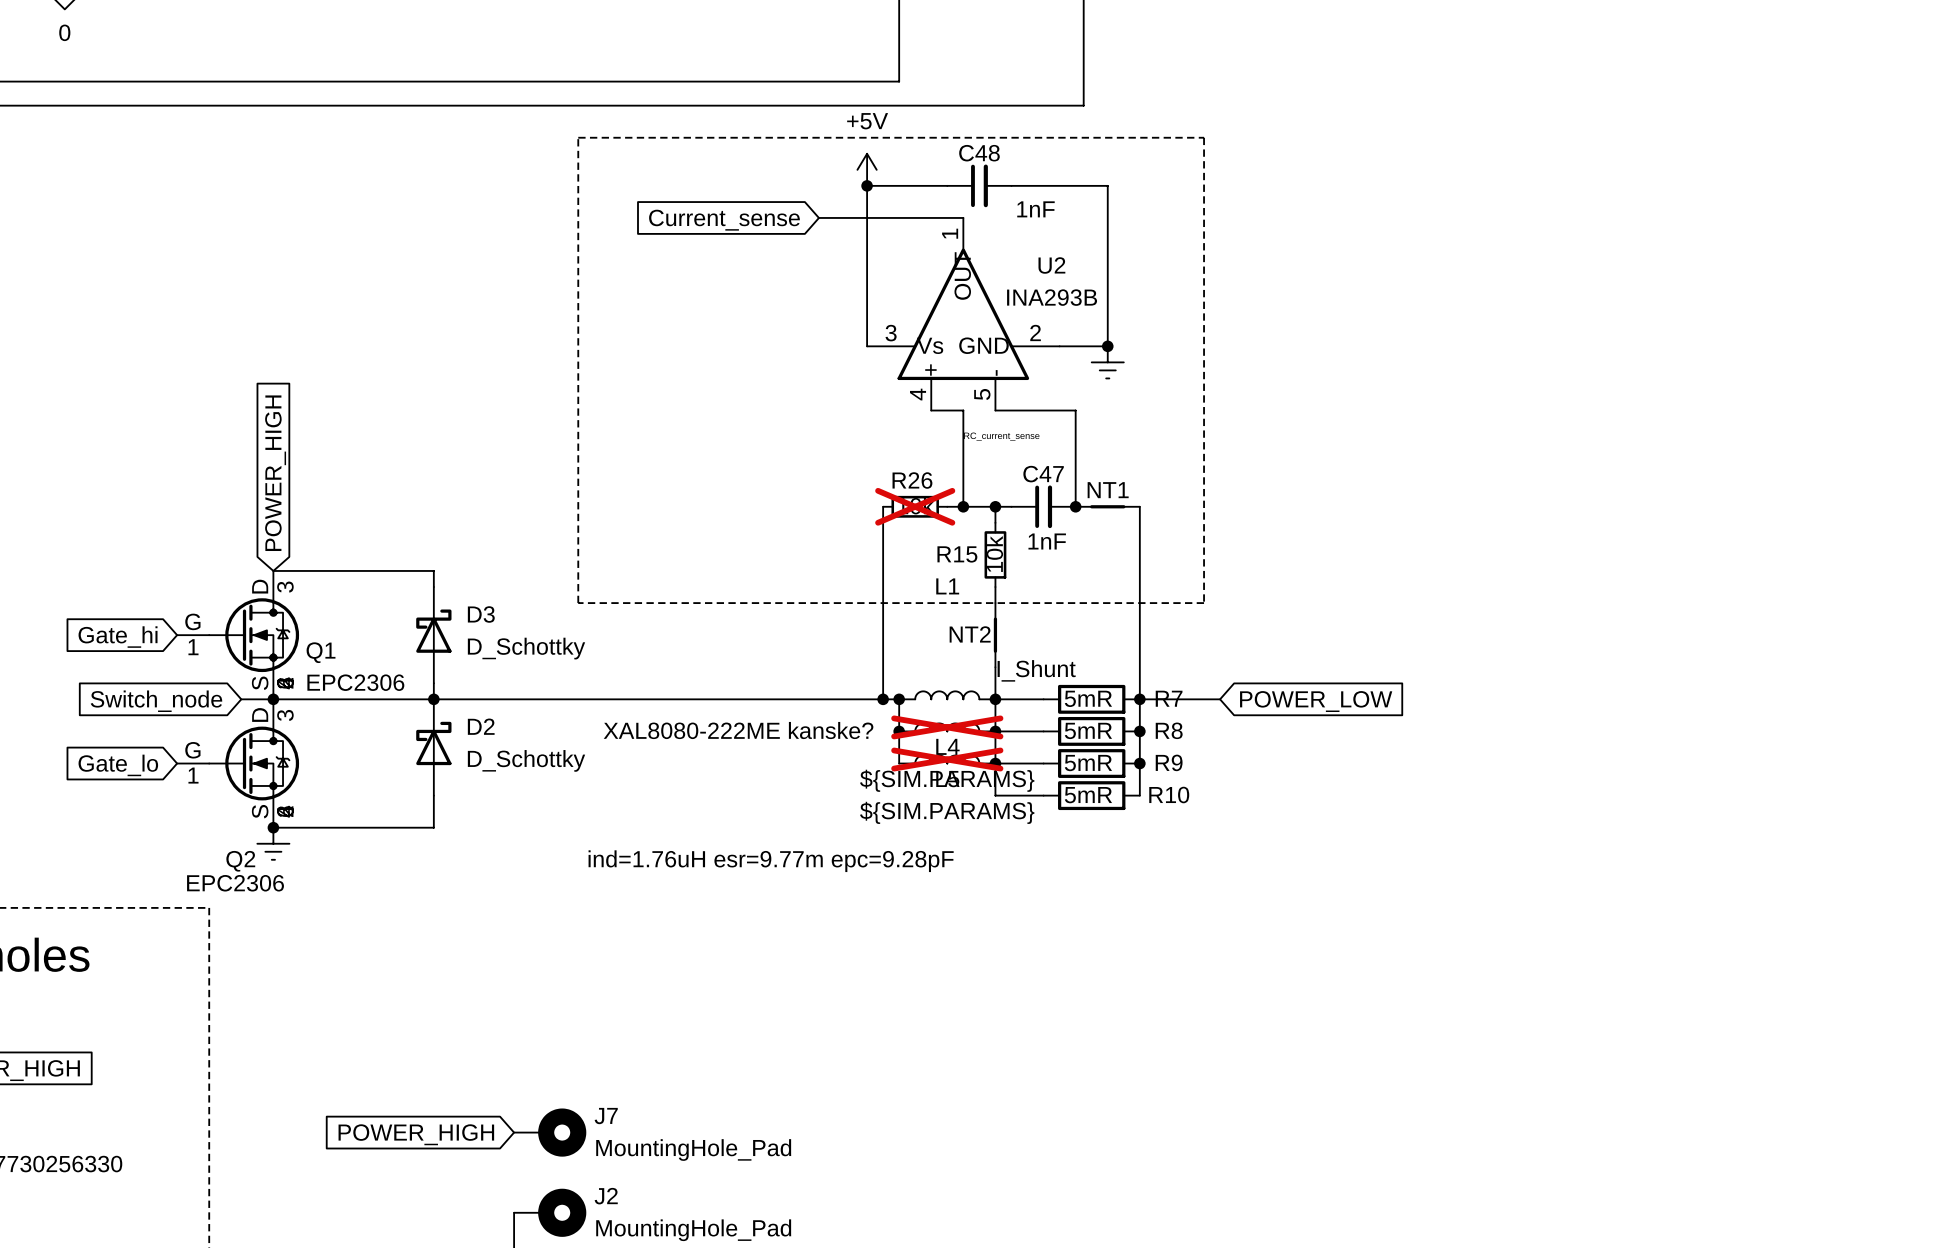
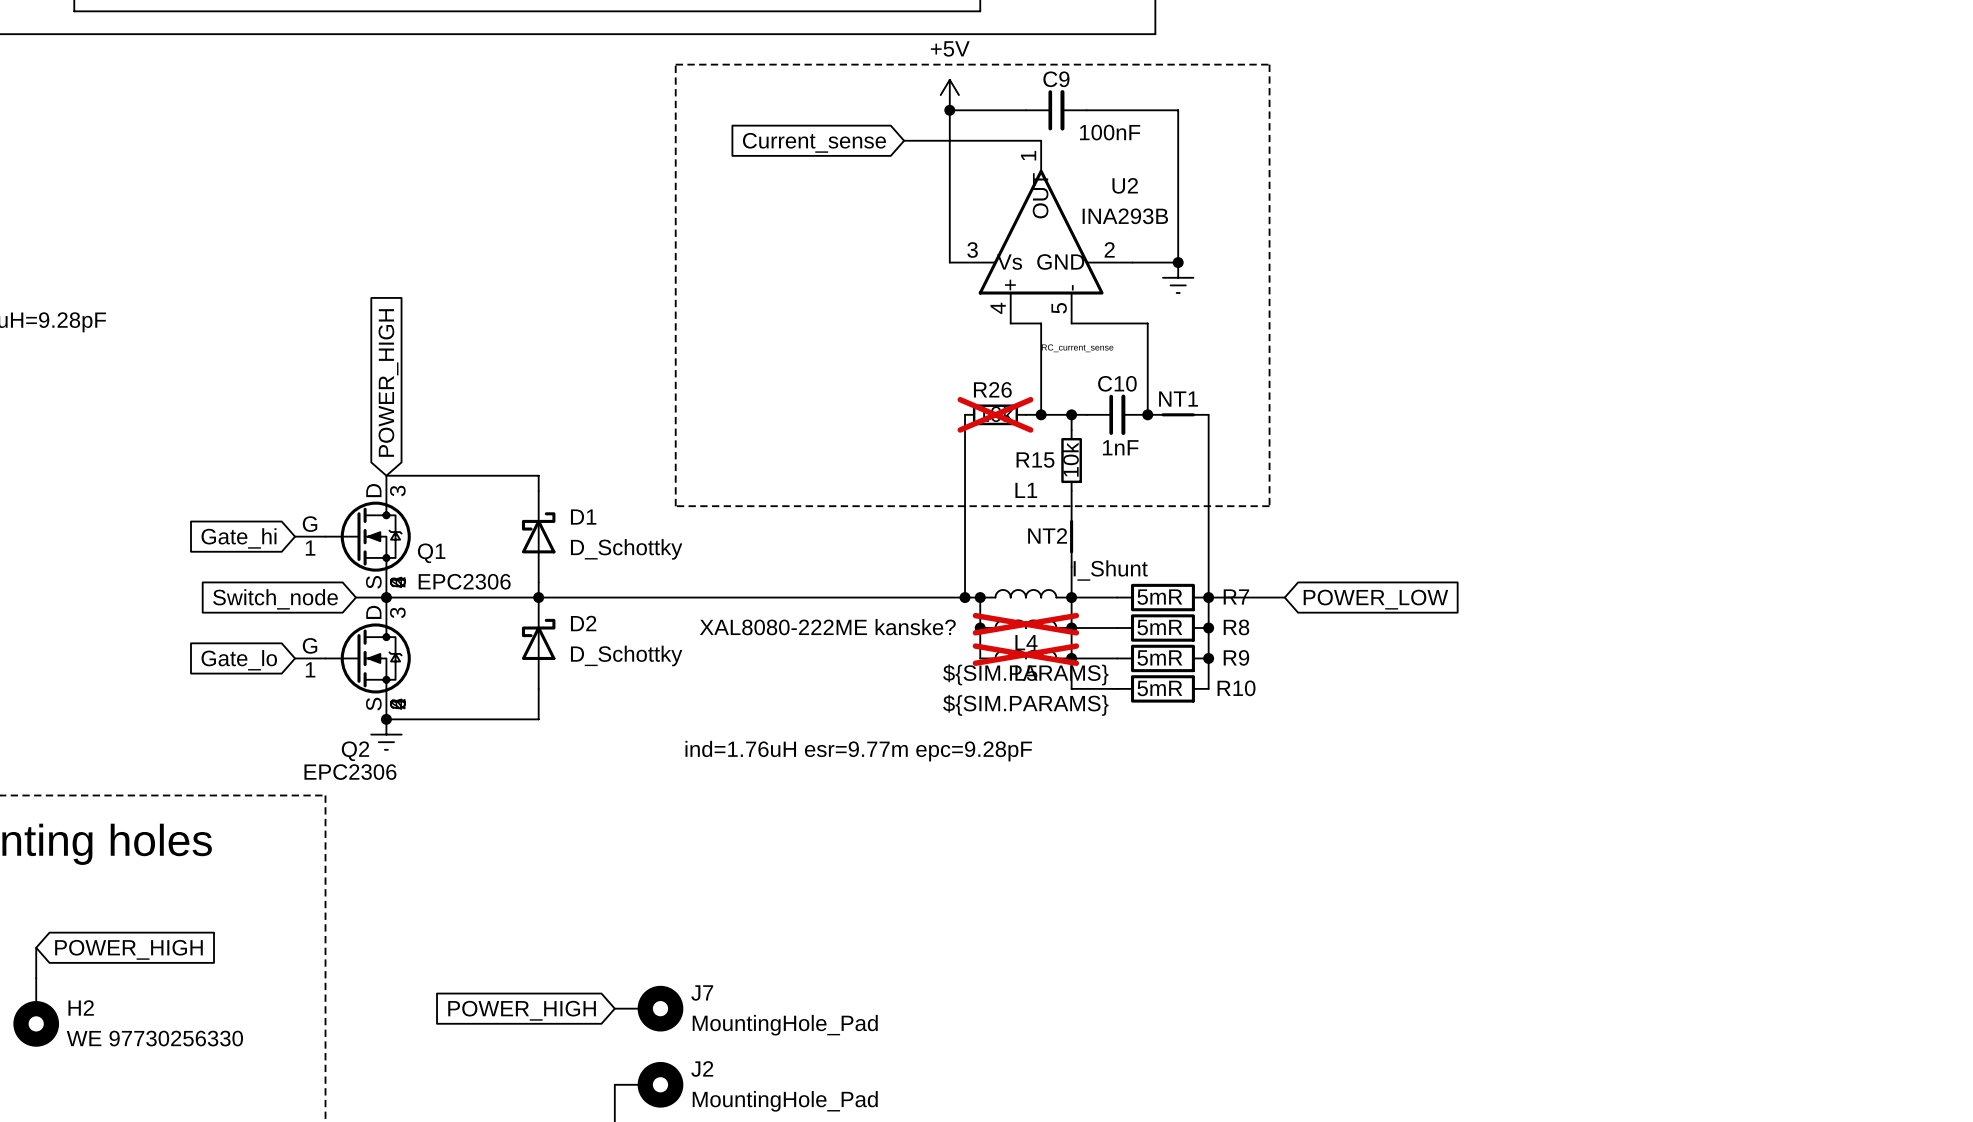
C48 name: C48 (979, 153) -> C9 (1056, 79)
C48 value: 1nF (1035, 209) -> 100nF (1110, 132)
C47 name: C47 (1043, 474) -> C10 (1117, 383)
D3 name: D3 (481, 614) -> D1 (583, 517)

